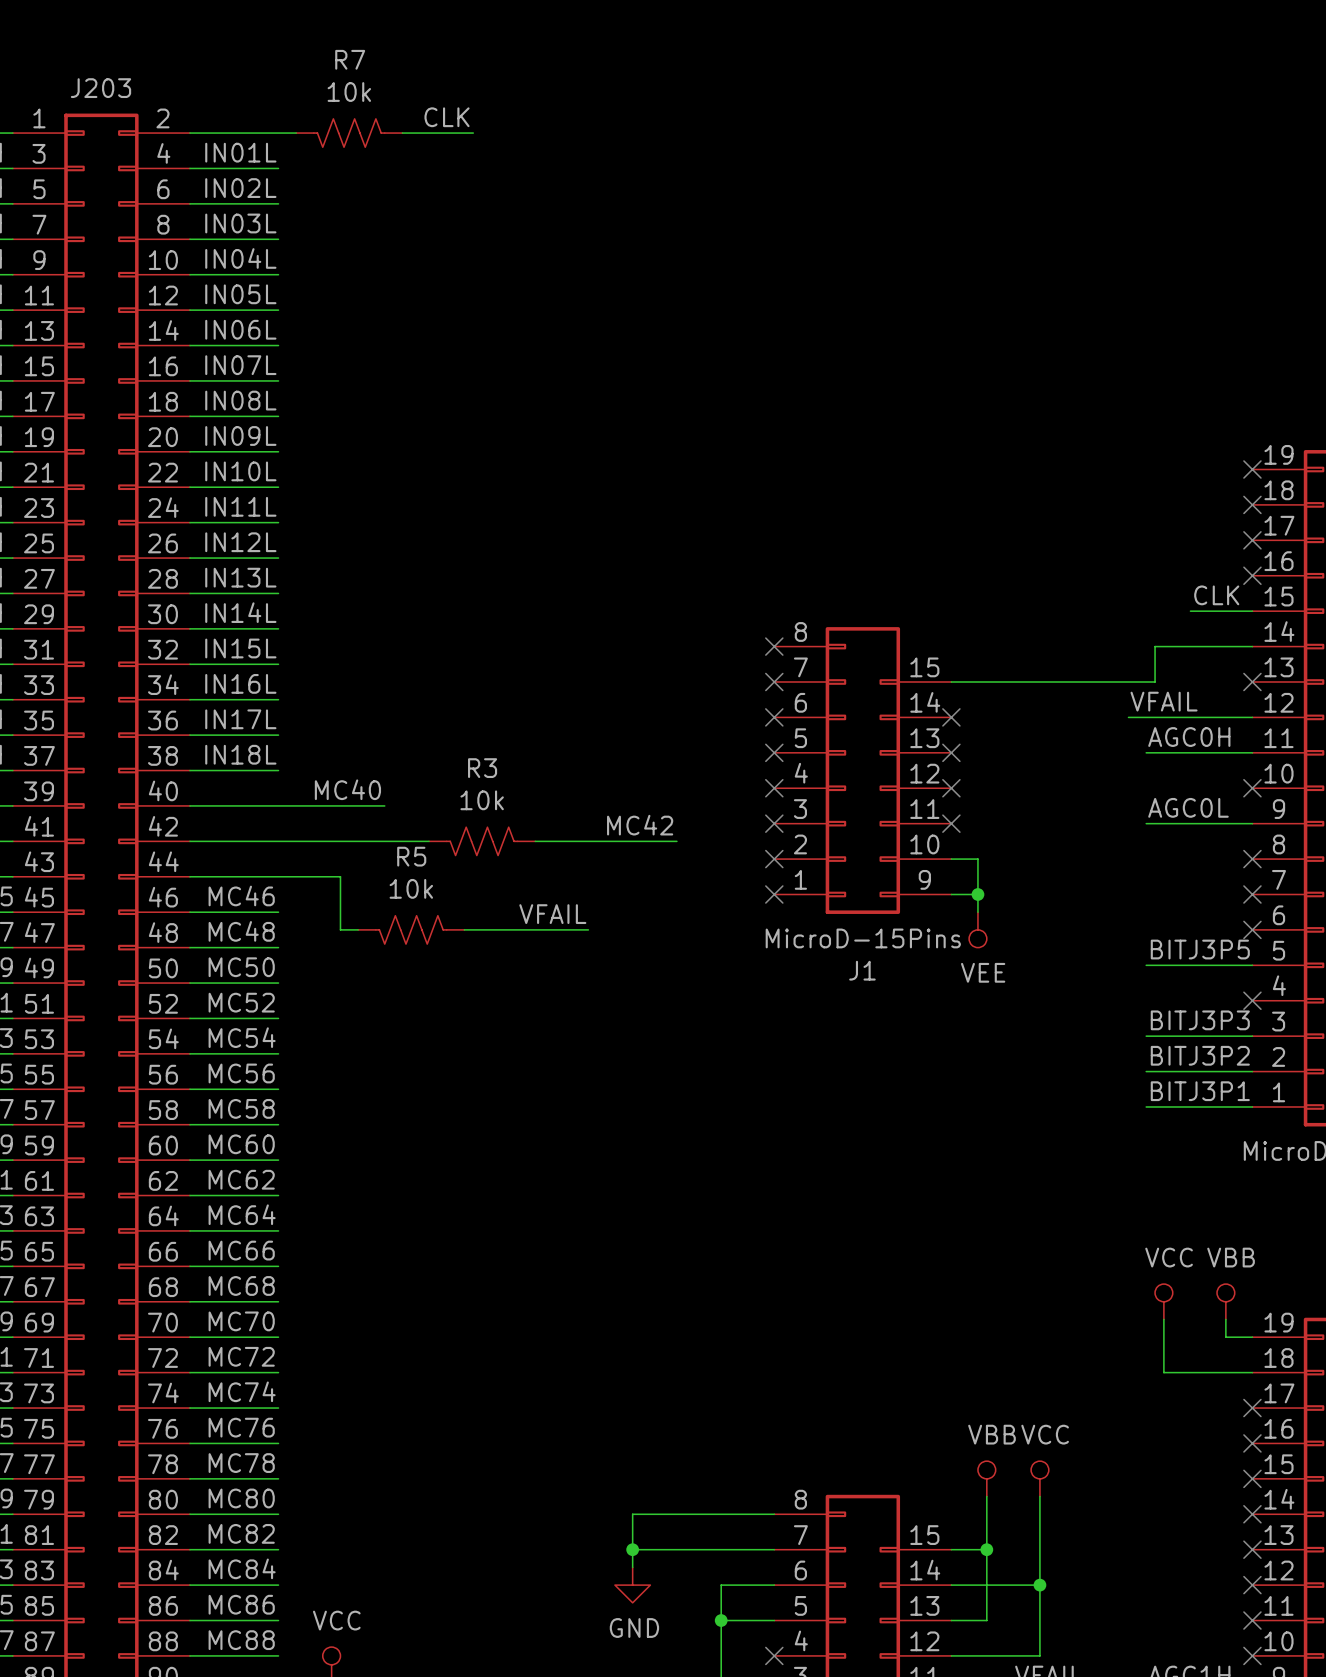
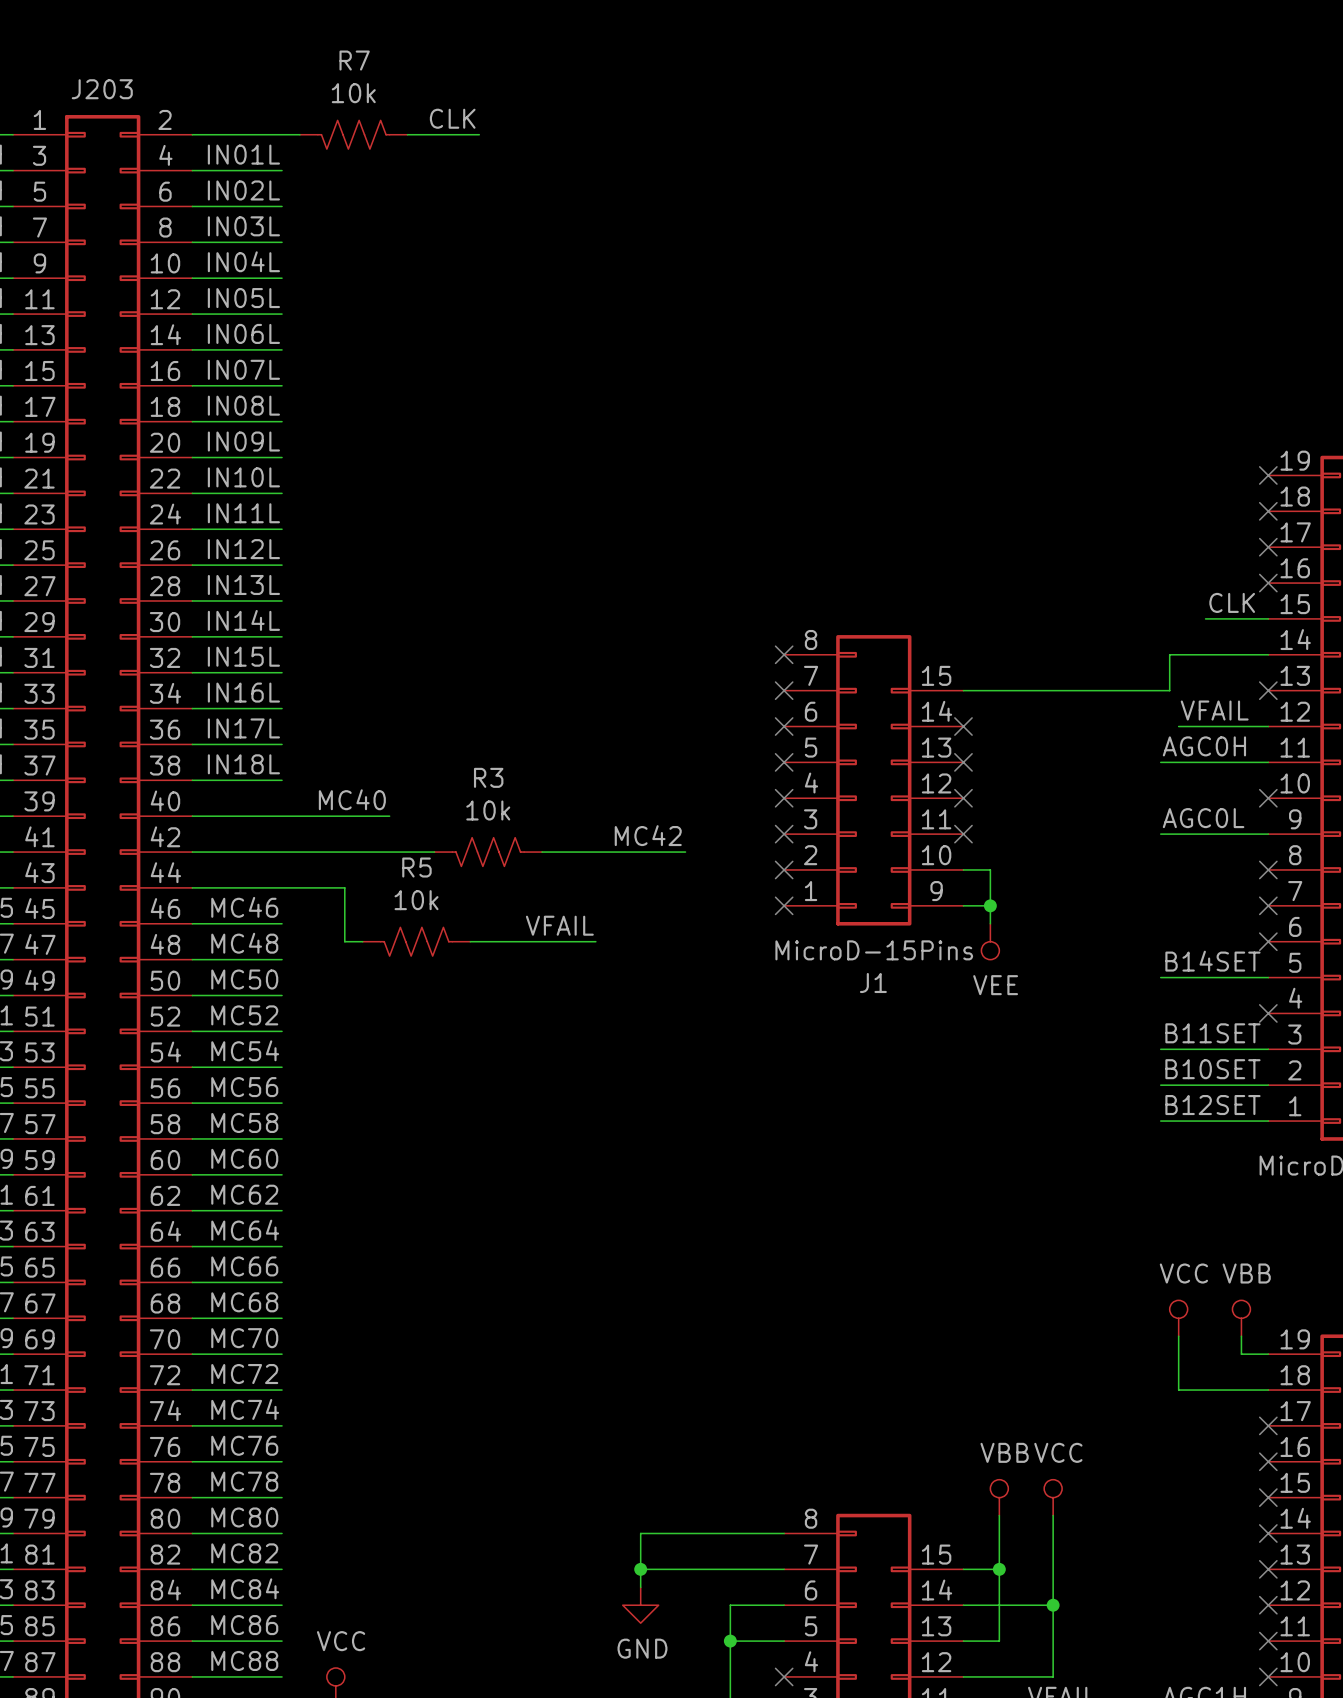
label position: VFAIL (1164, 701) -> VFAIL (1214, 710)
wire: (1128, 717) (1163, 717) -> none
label: BITJ3P5 (1200, 949) -> B14SET (1212, 961)
label: BITJ3P3 (1200, 1020) -> B11SET (1212, 1033)
label: BITJ3P2 (1200, 1055) -> B10SET (1212, 1069)
label: BITJ3P1 (1200, 1091) -> B12SET (1212, 1105)

